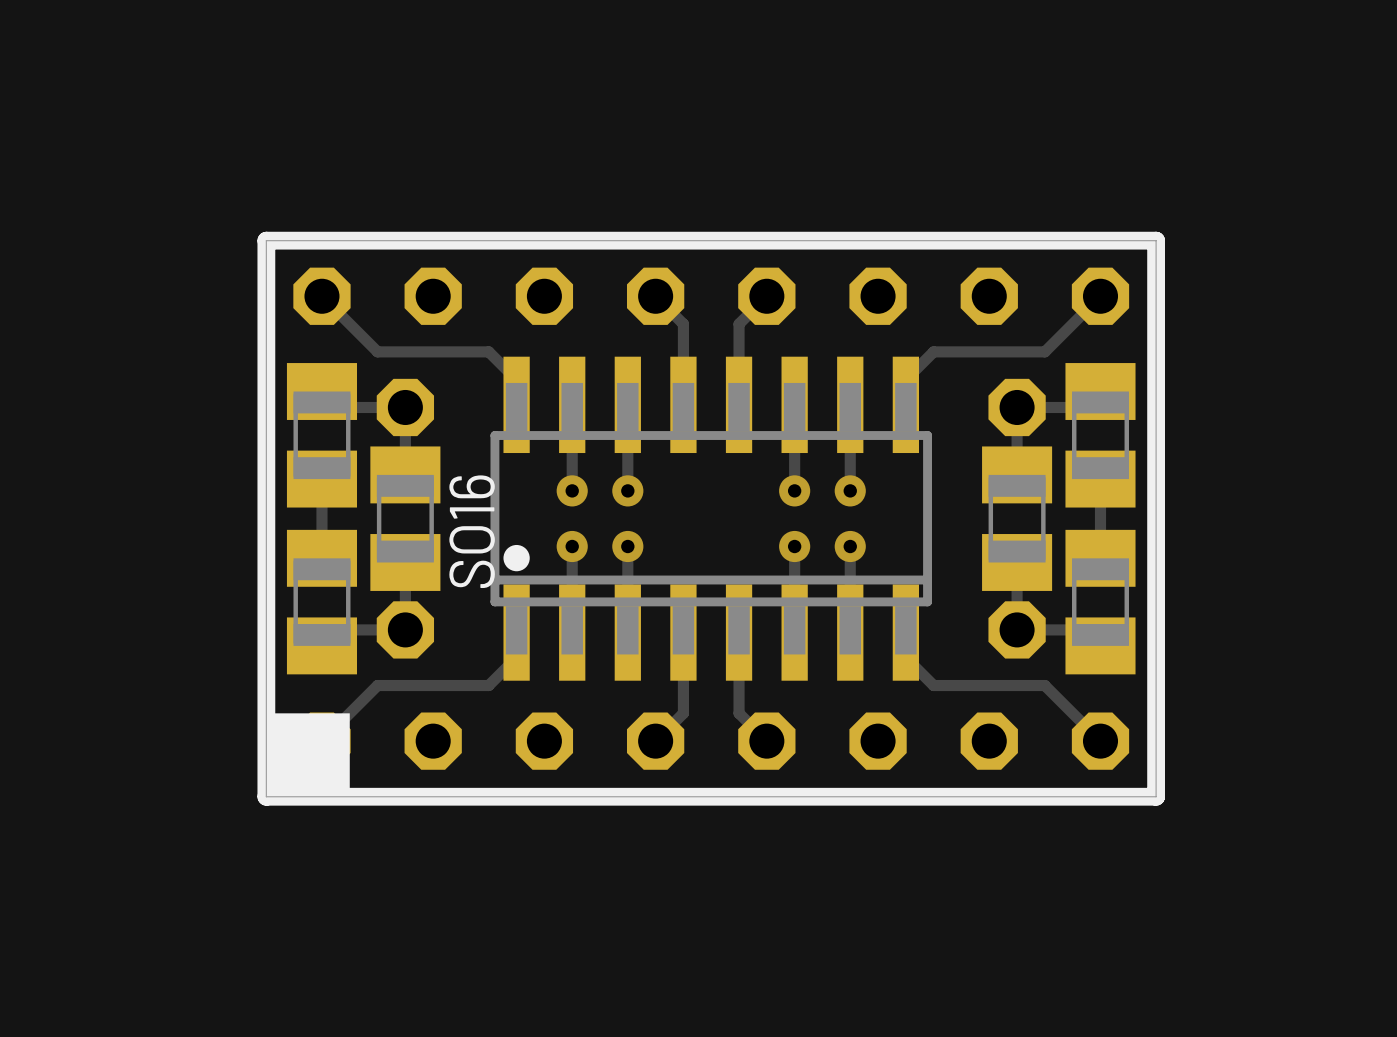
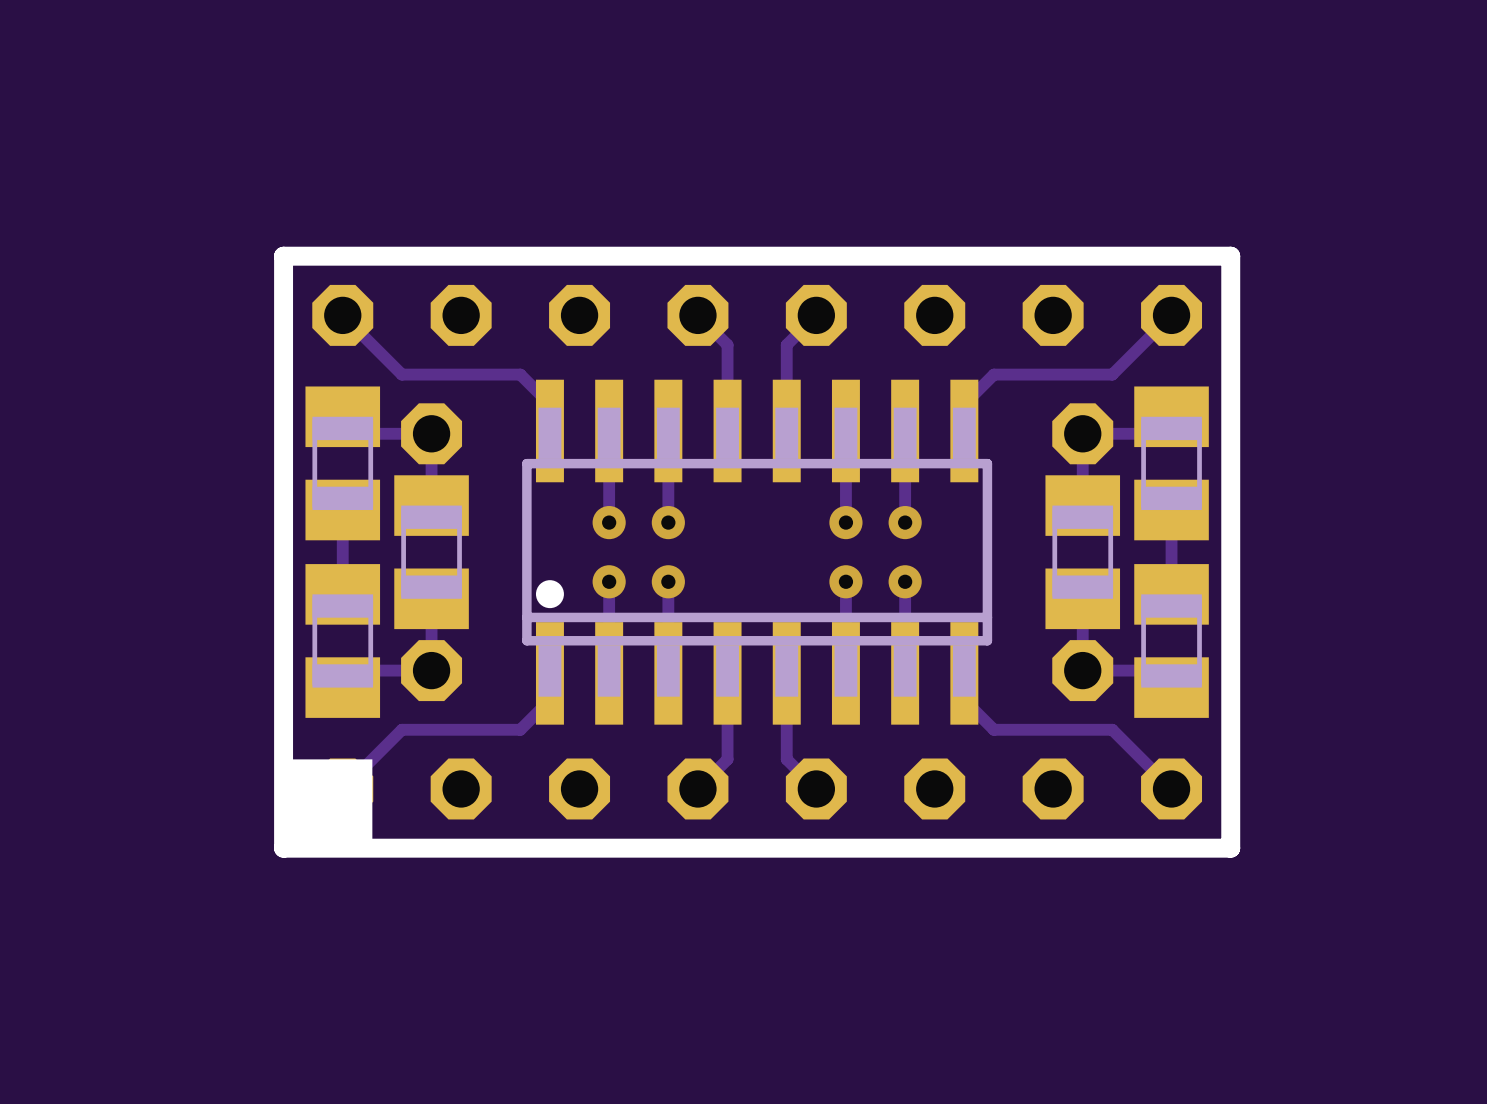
board edge: (266, 240) (1156, 240) (1156, 796) (266, 796) (266, 240) -> none
text: SO16 (472, 531) -> none

